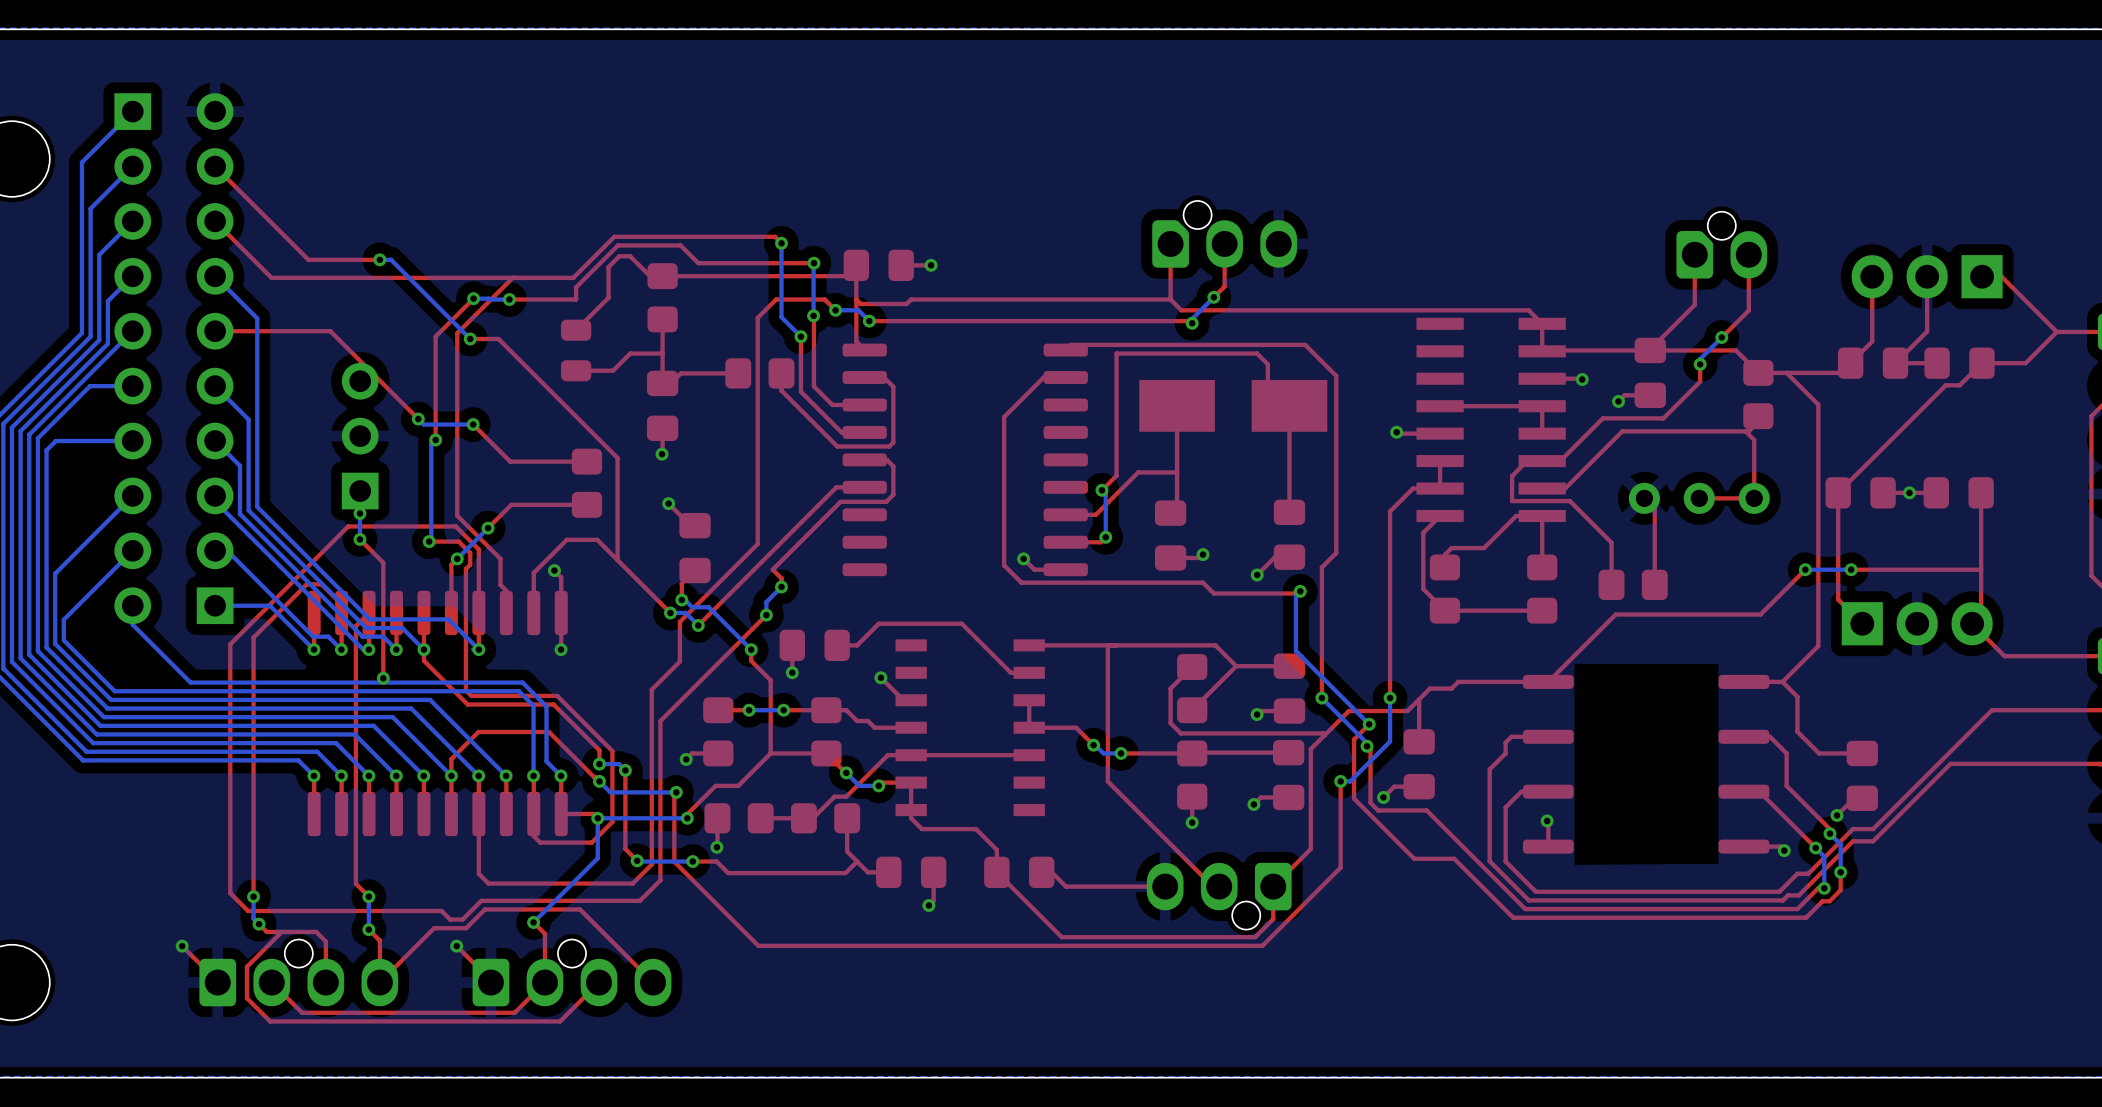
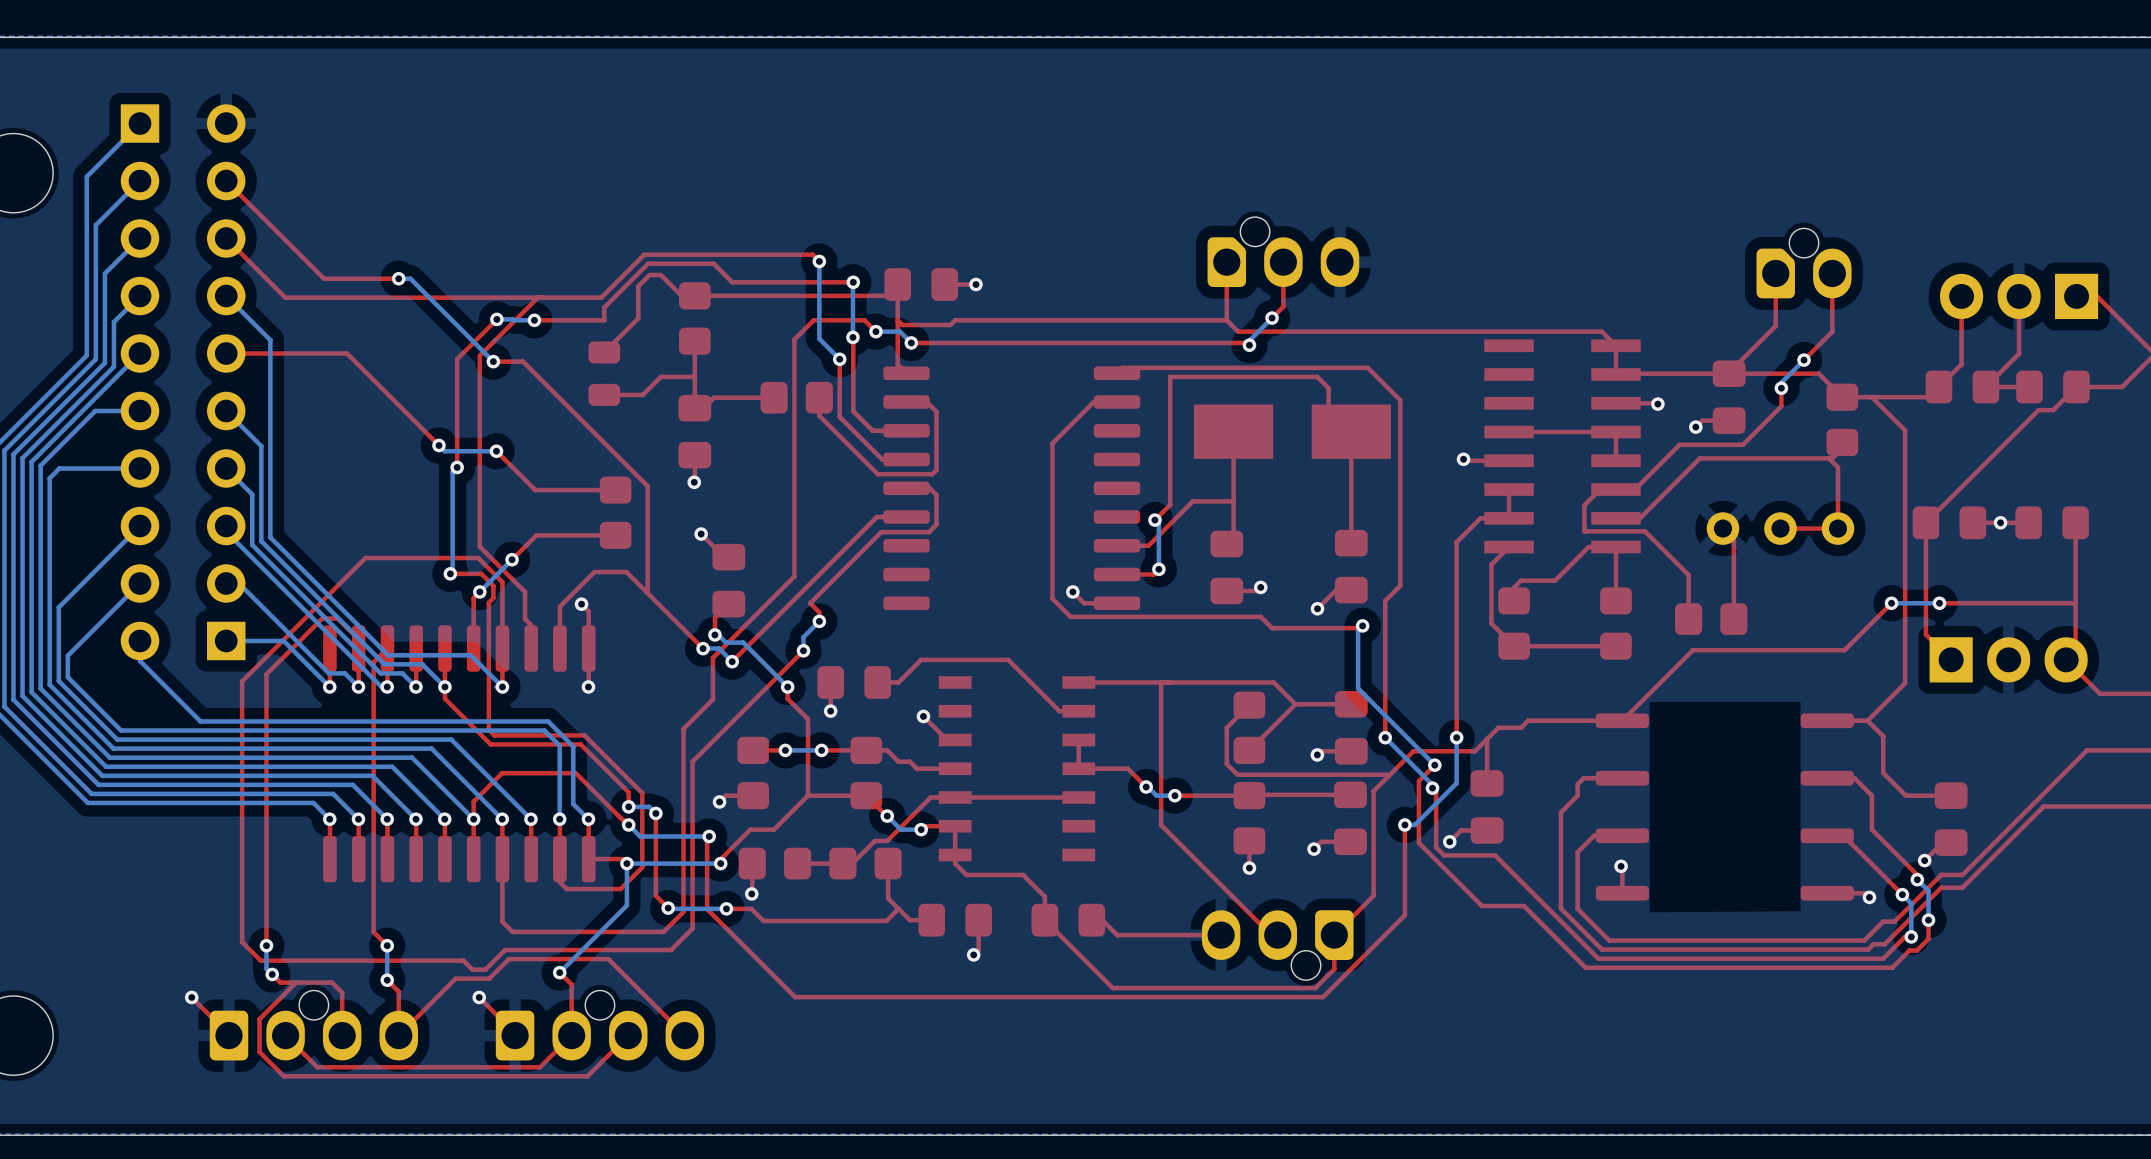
part: (360, 436) -> none
bottom track: (359, 513) (359, 539) -> none
via: (359, 513) -> none
top track: (359, 539) (383, 562) (383, 678) -> none
via: (359, 539) -> none
via: (383, 678) -> none

